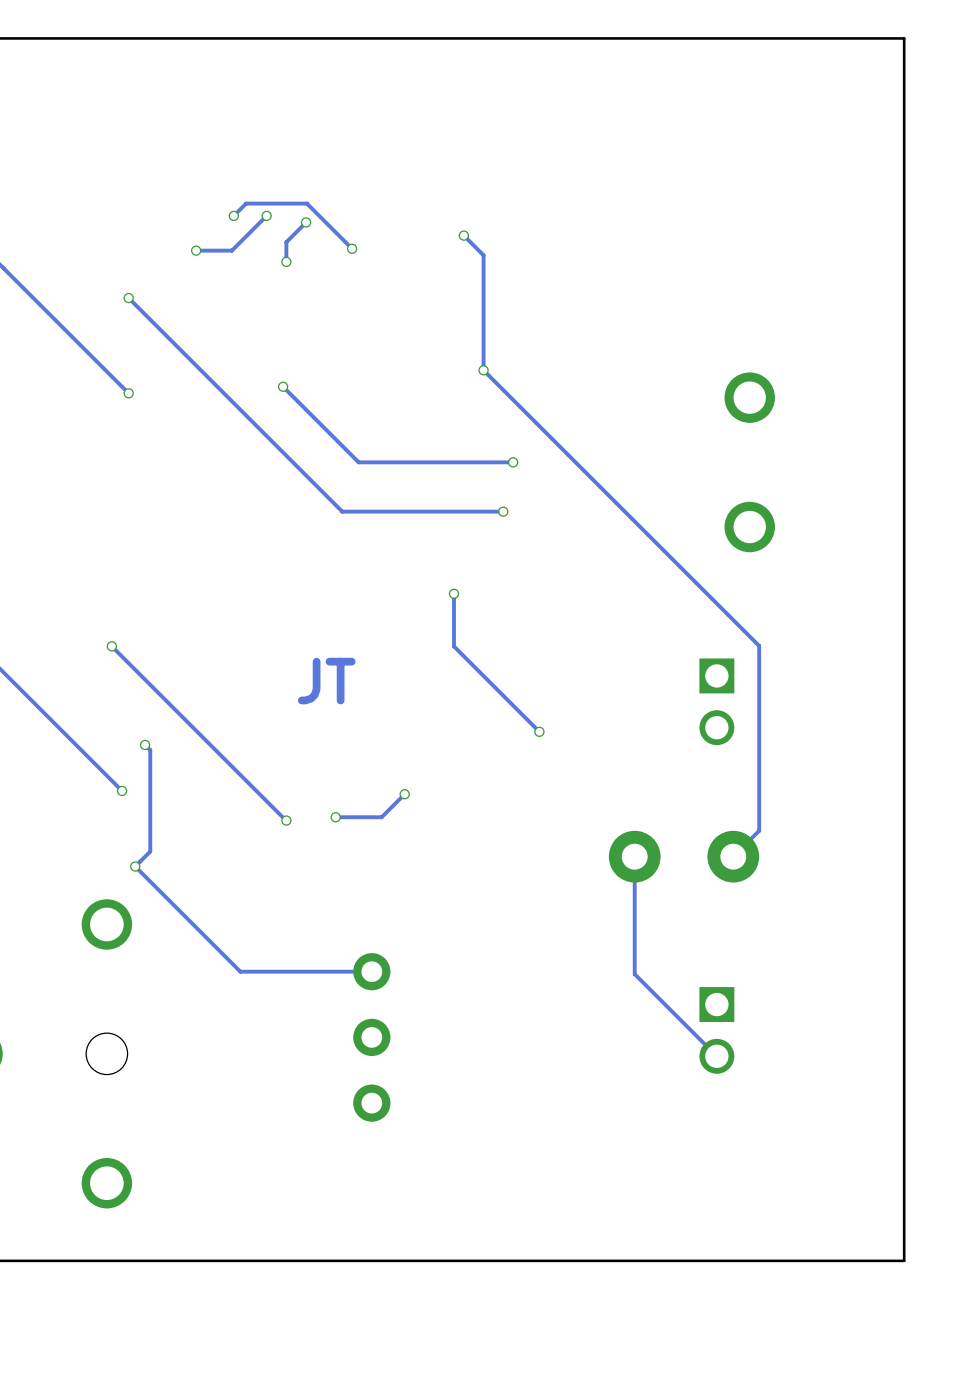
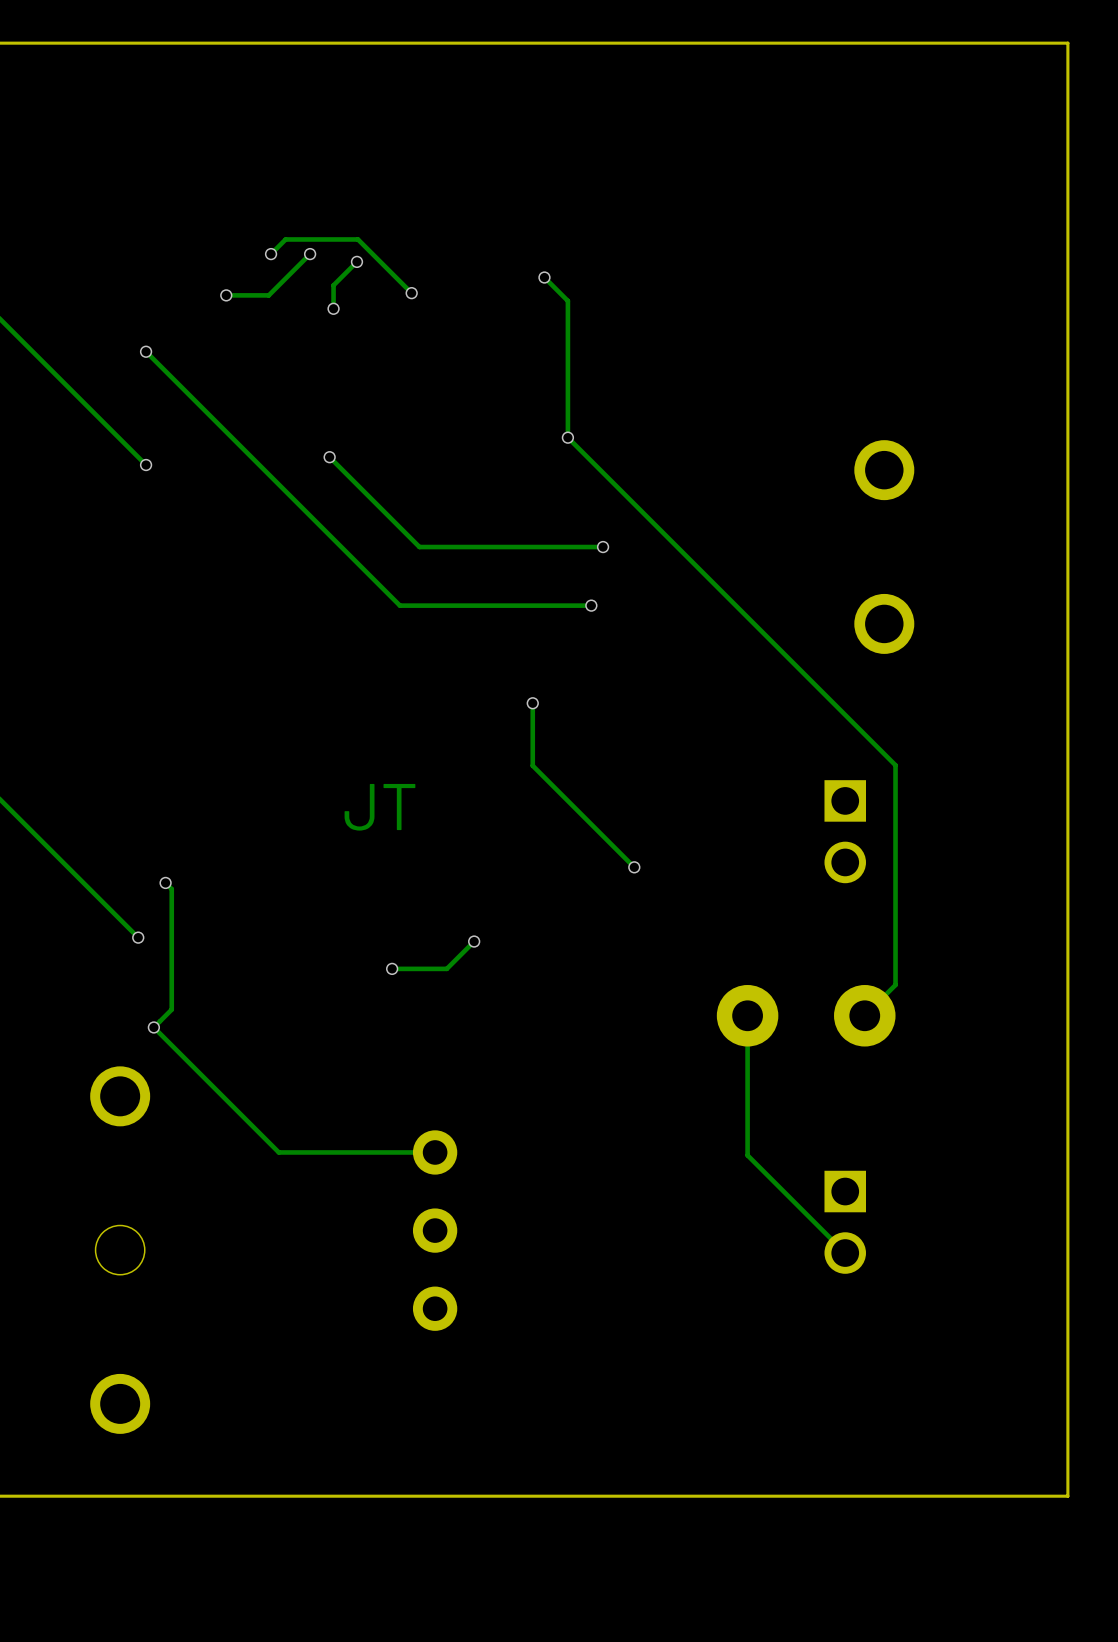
track: (111, 646) (286, 820) -> none
via: (111, 646) -> none
via: (286, 820) -> none

